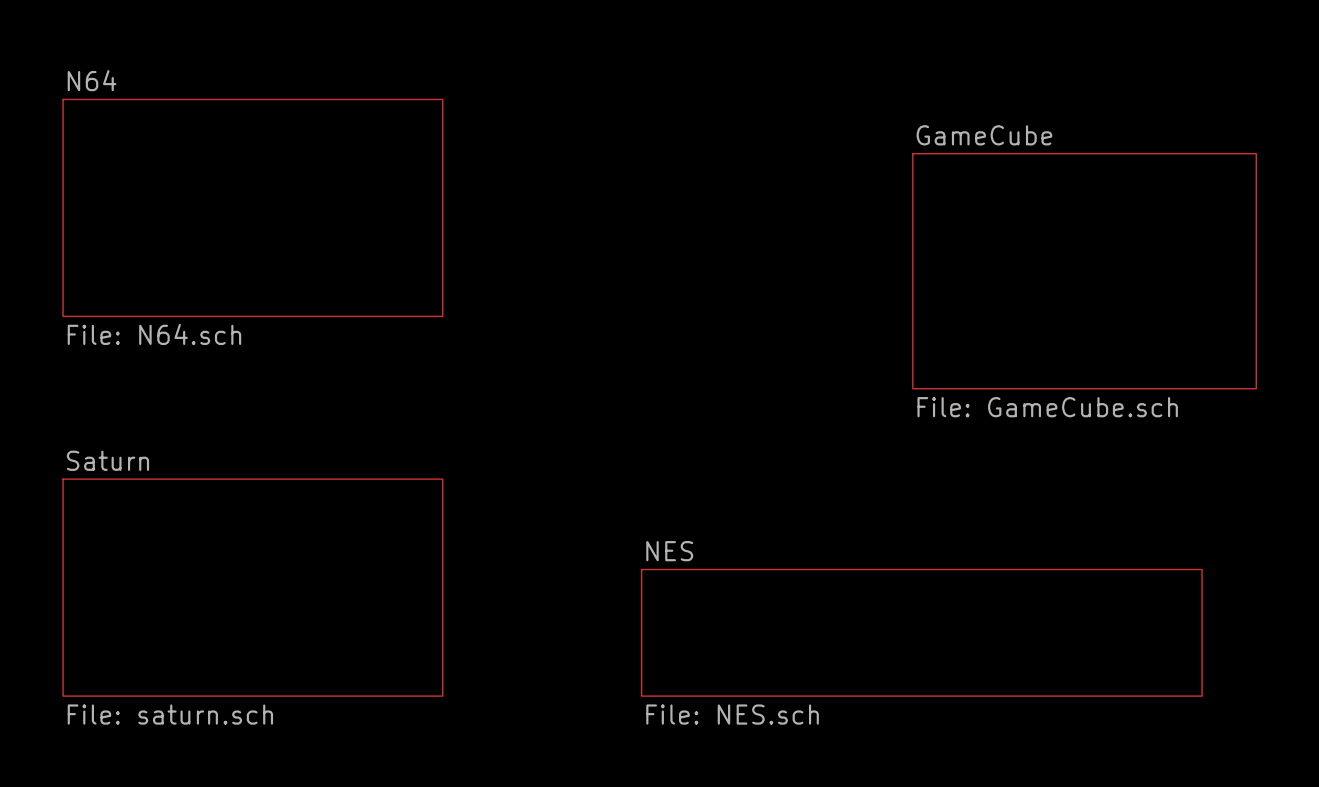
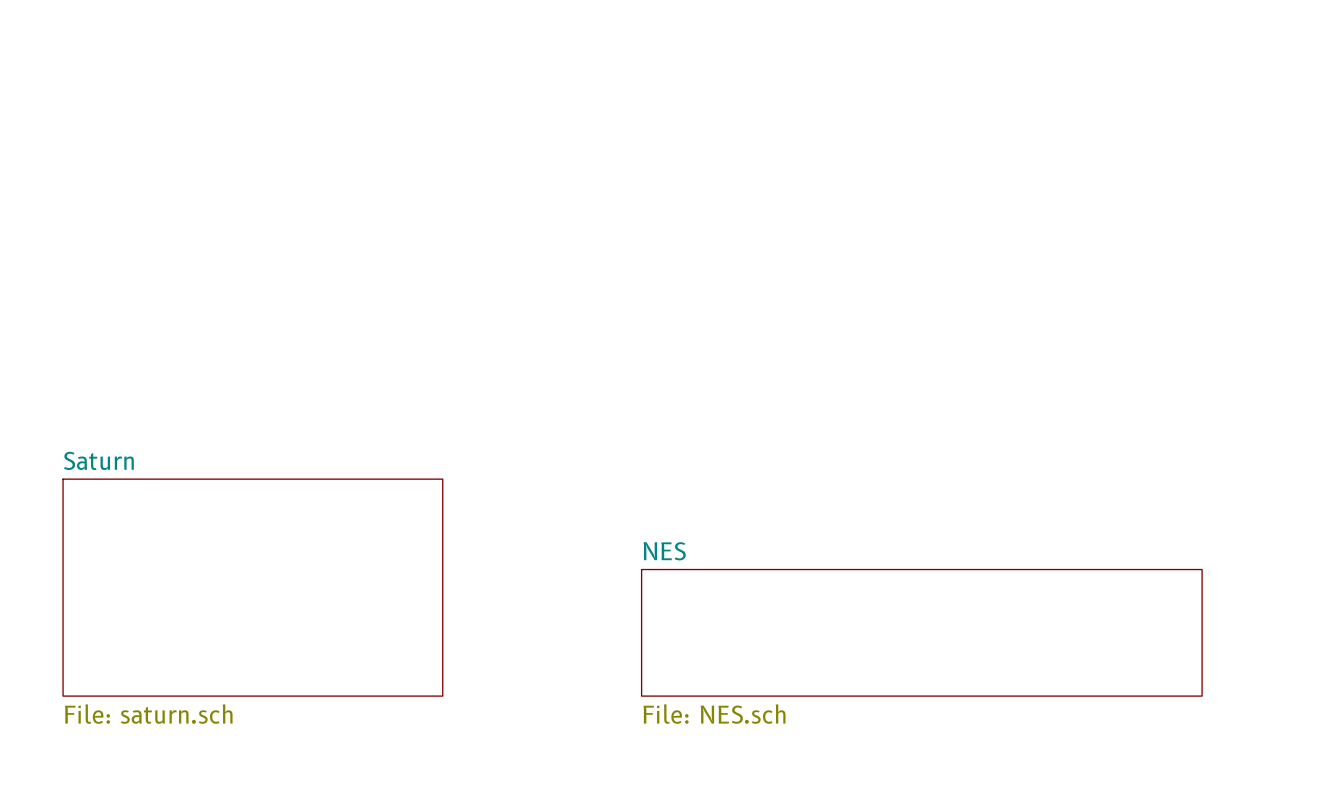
sheet N64: File: N64.sch (252, 207) -> none
sheet GameCube: File: GameCube.sch (1084, 271) -> none

